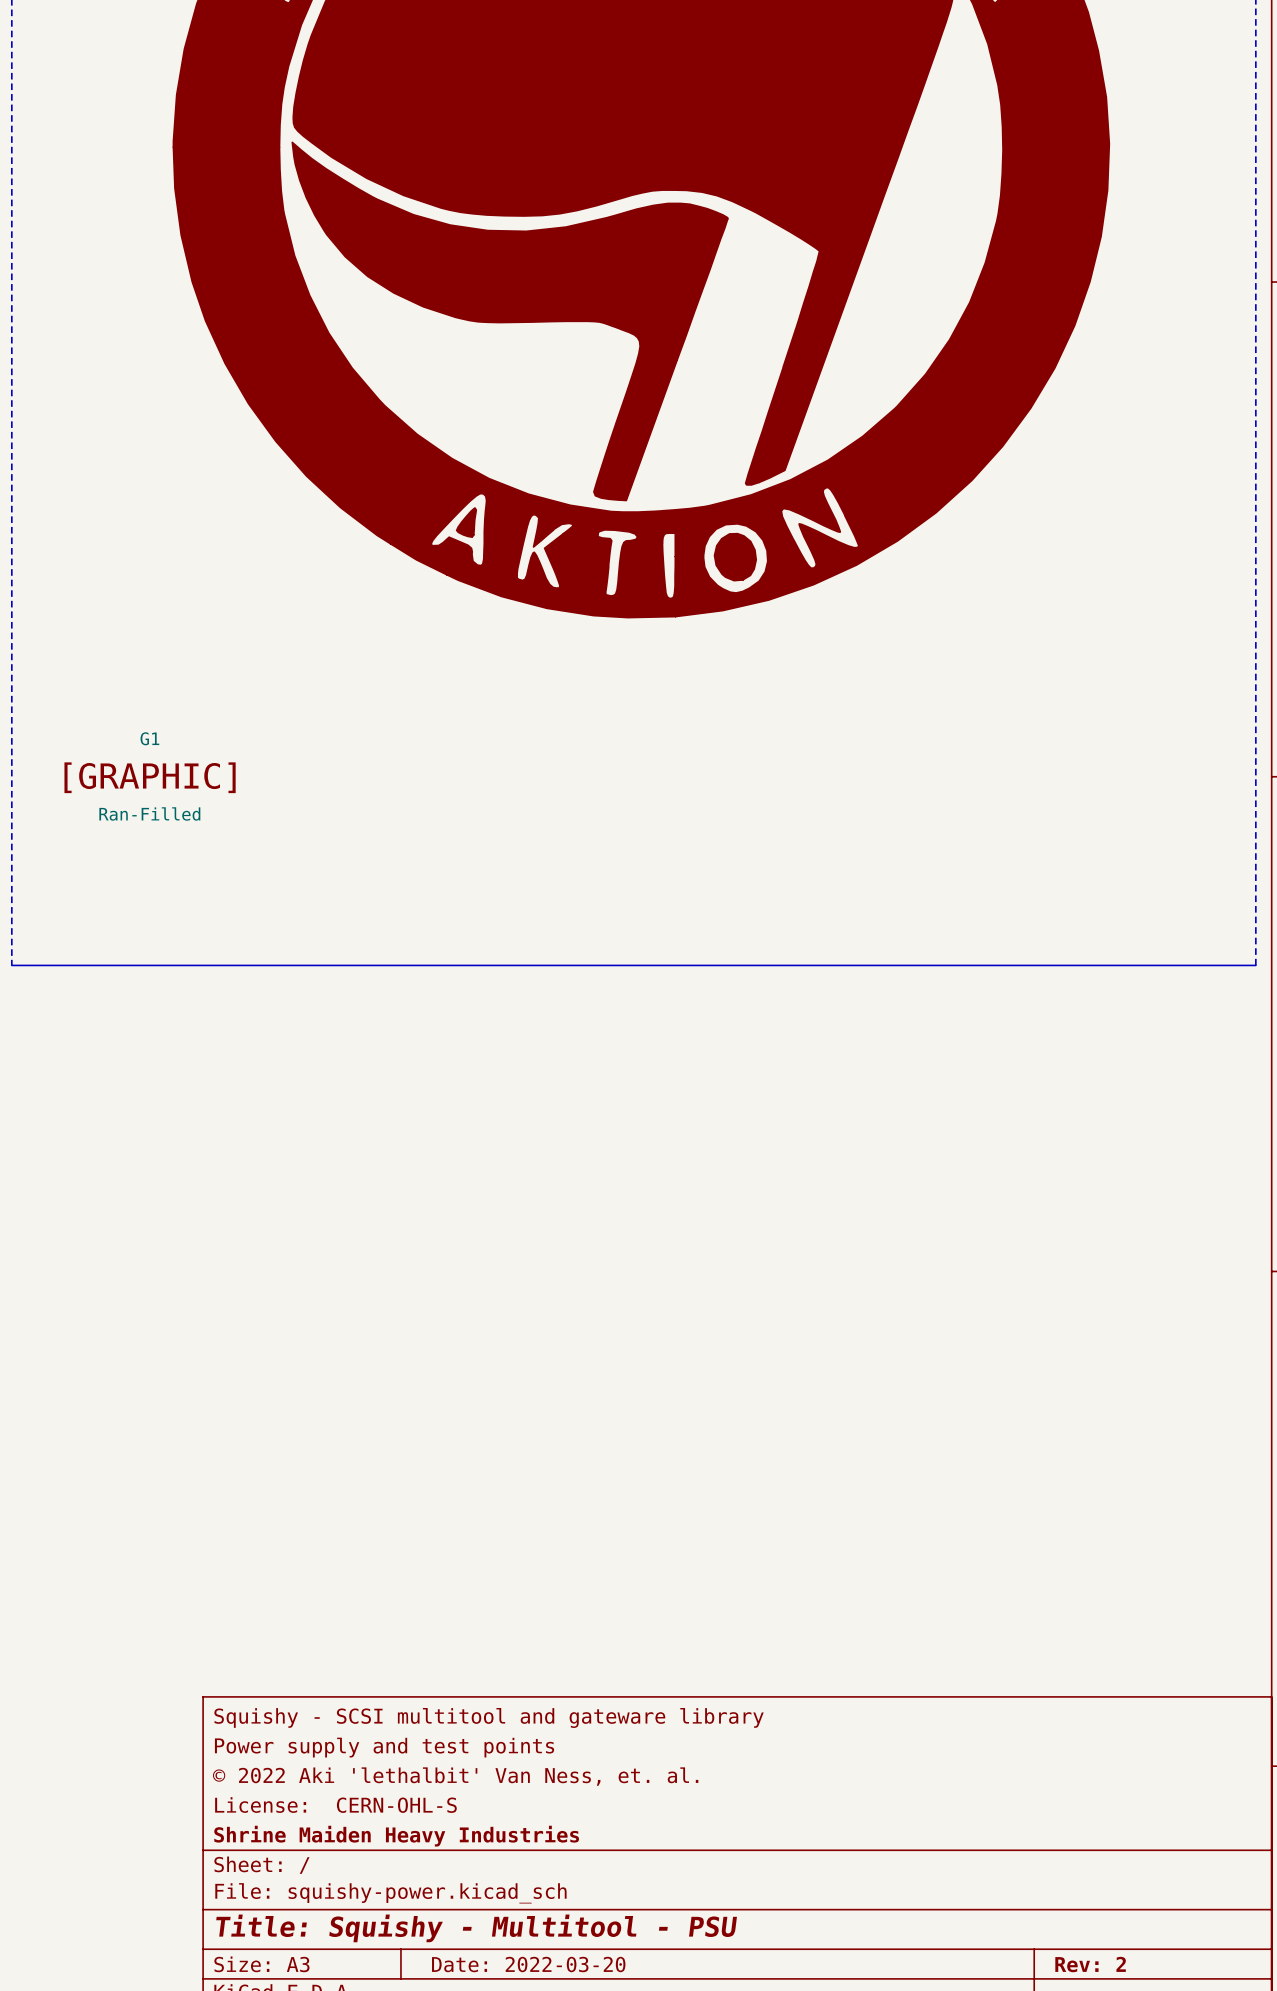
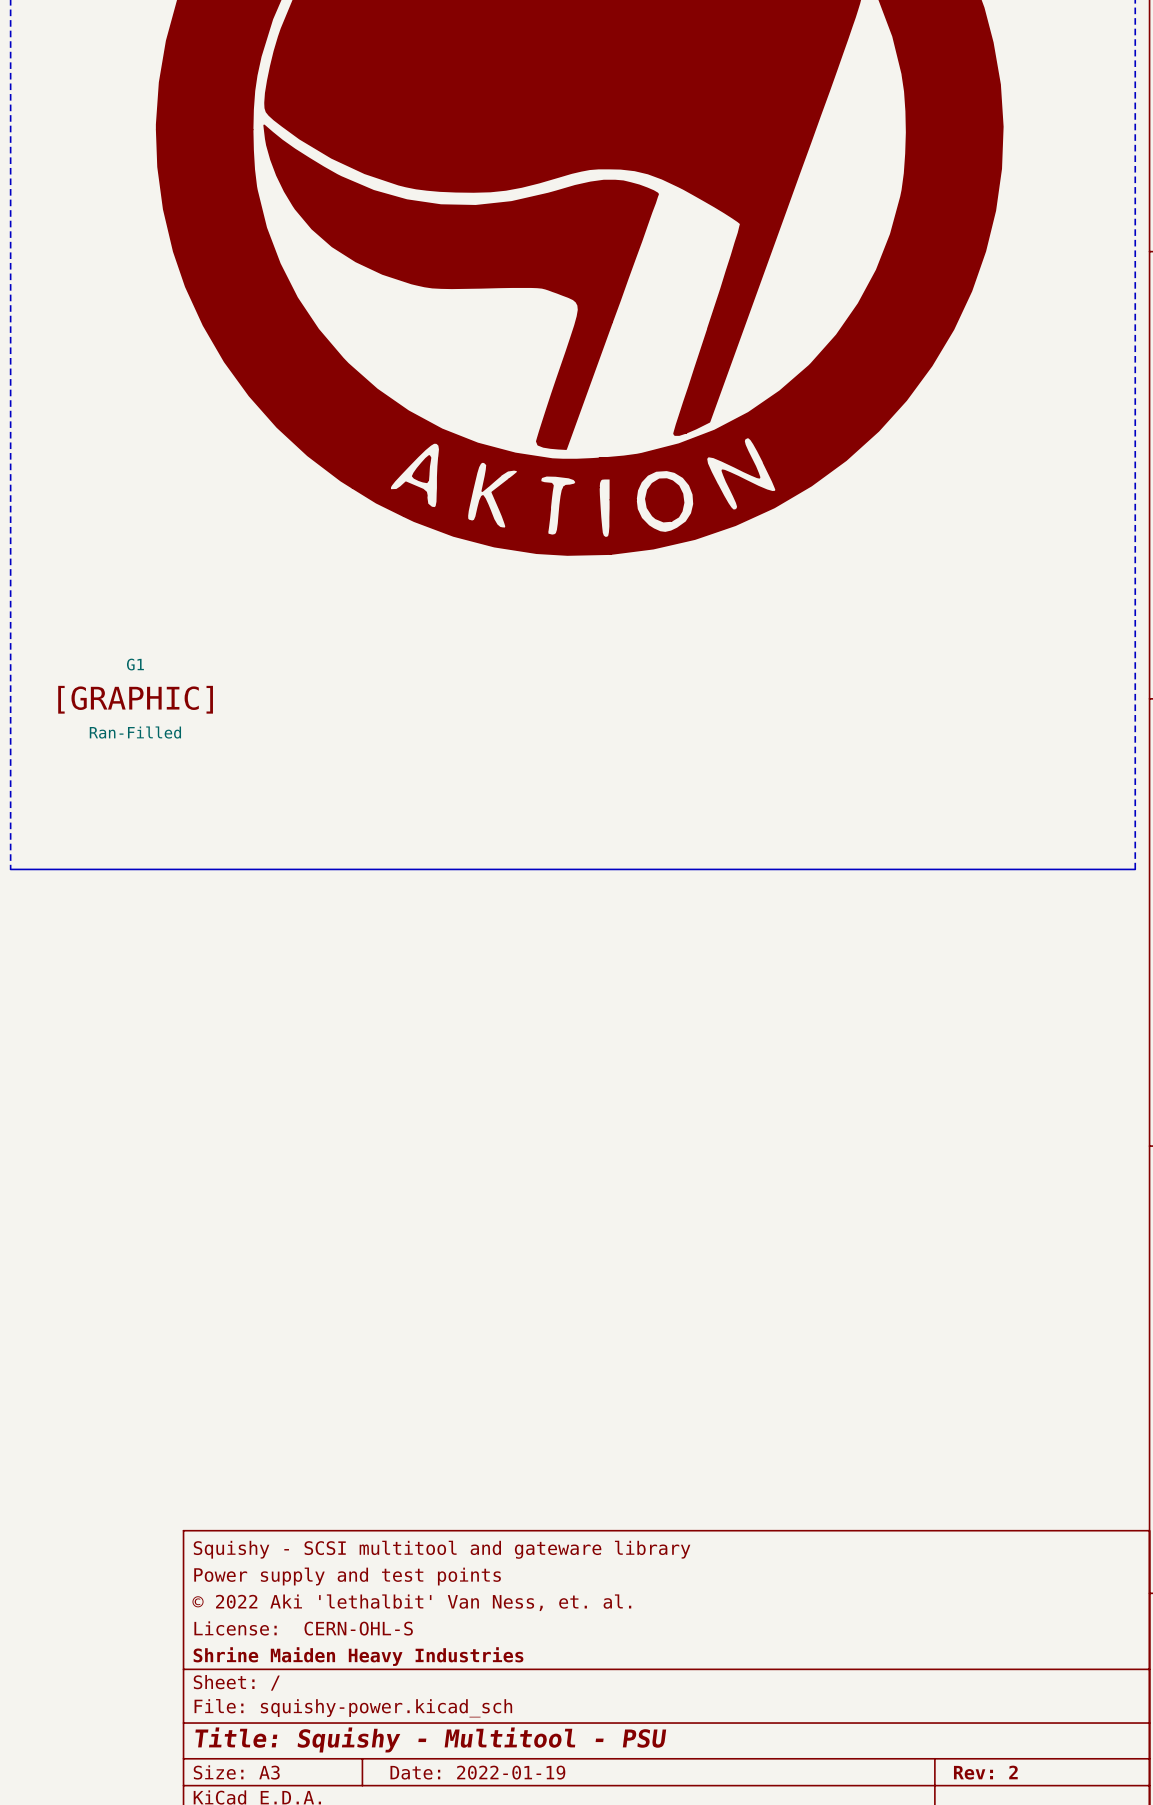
title block: Date: 2022-03-20 (528, 1964) -> Date: 2022-01-19 (477, 1772)

